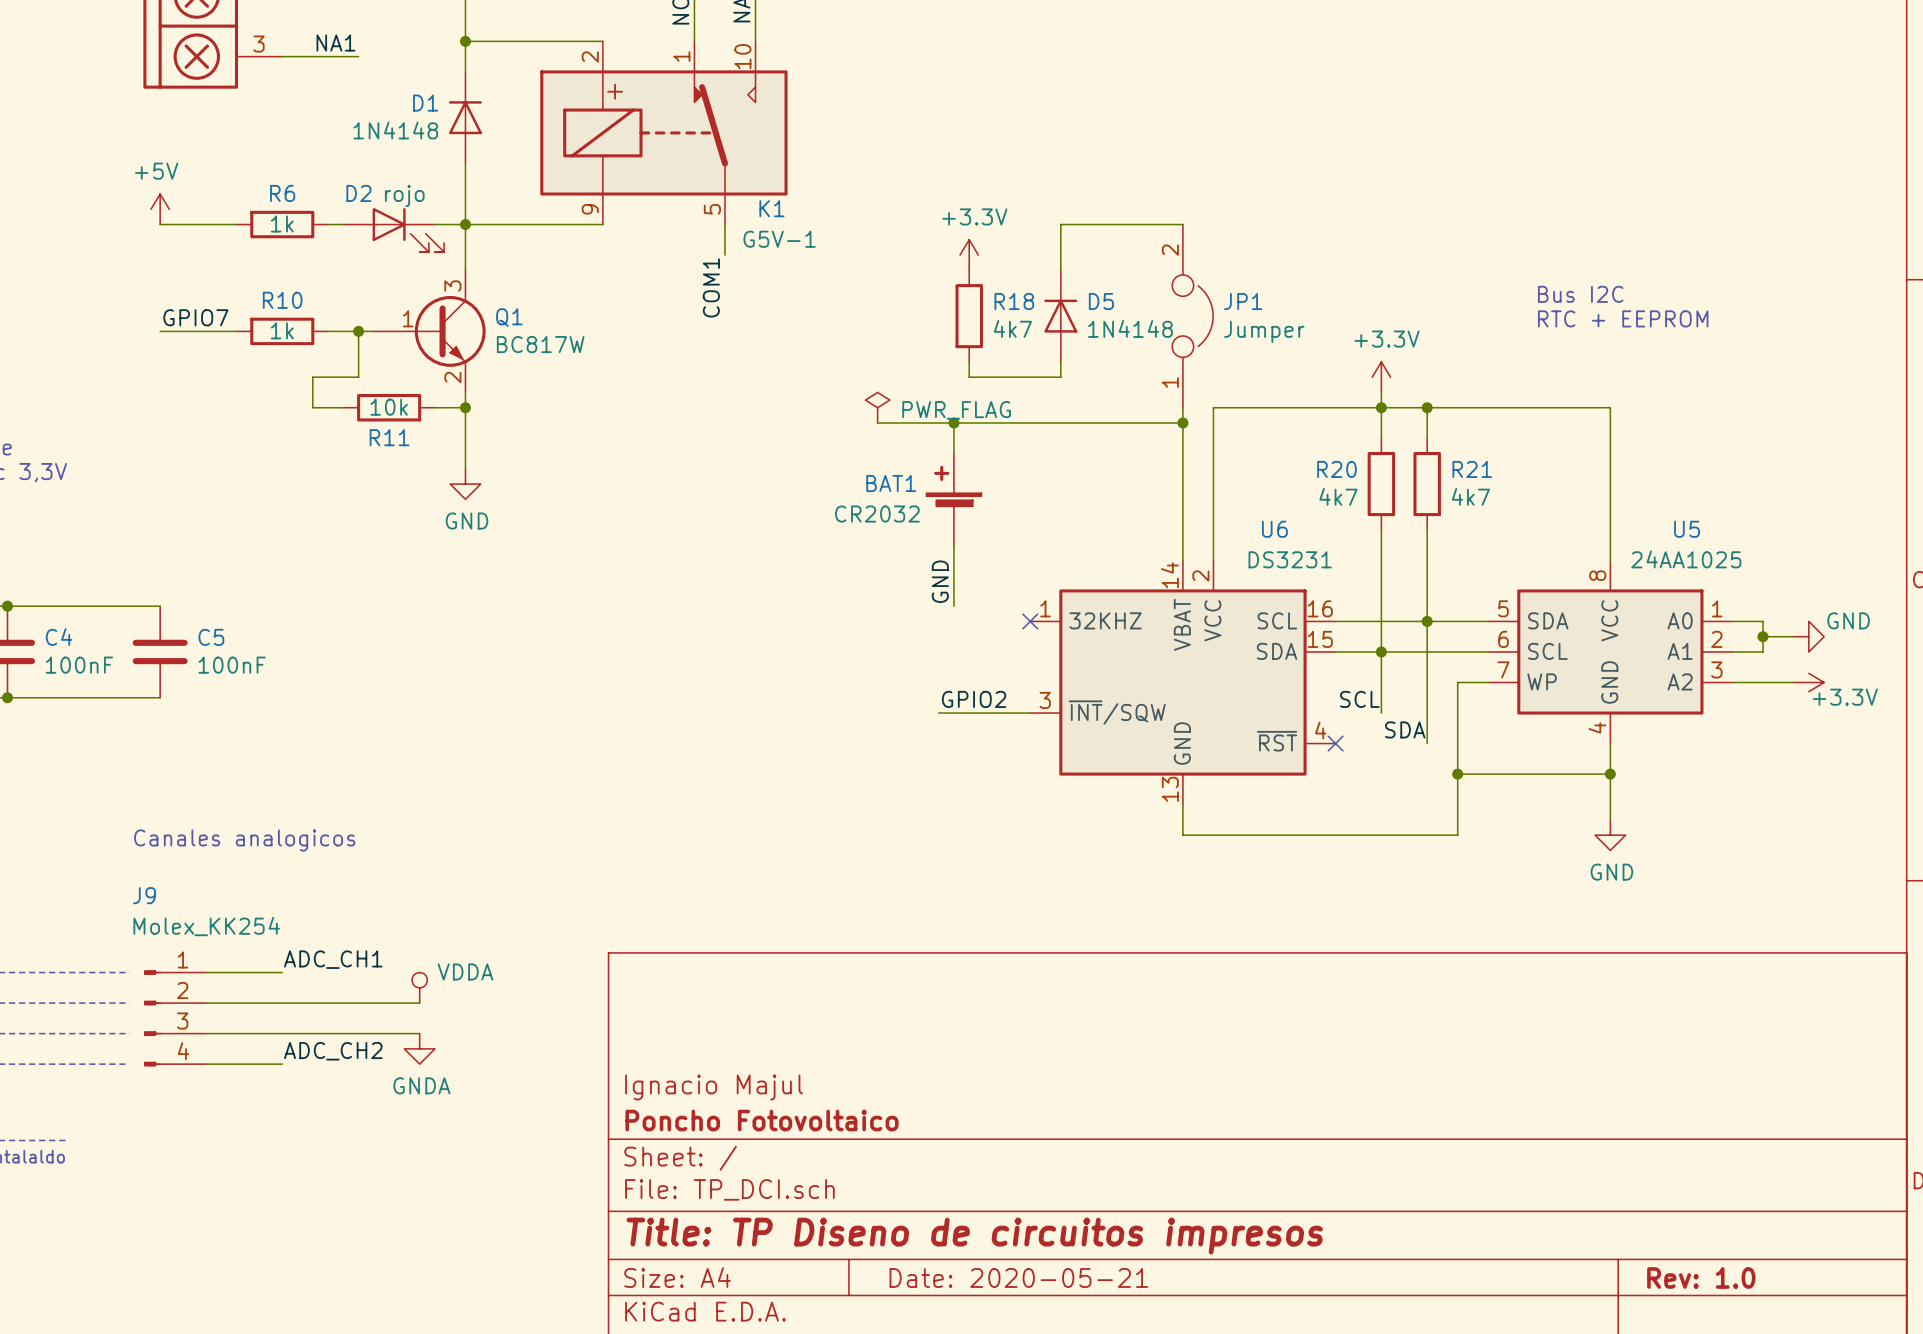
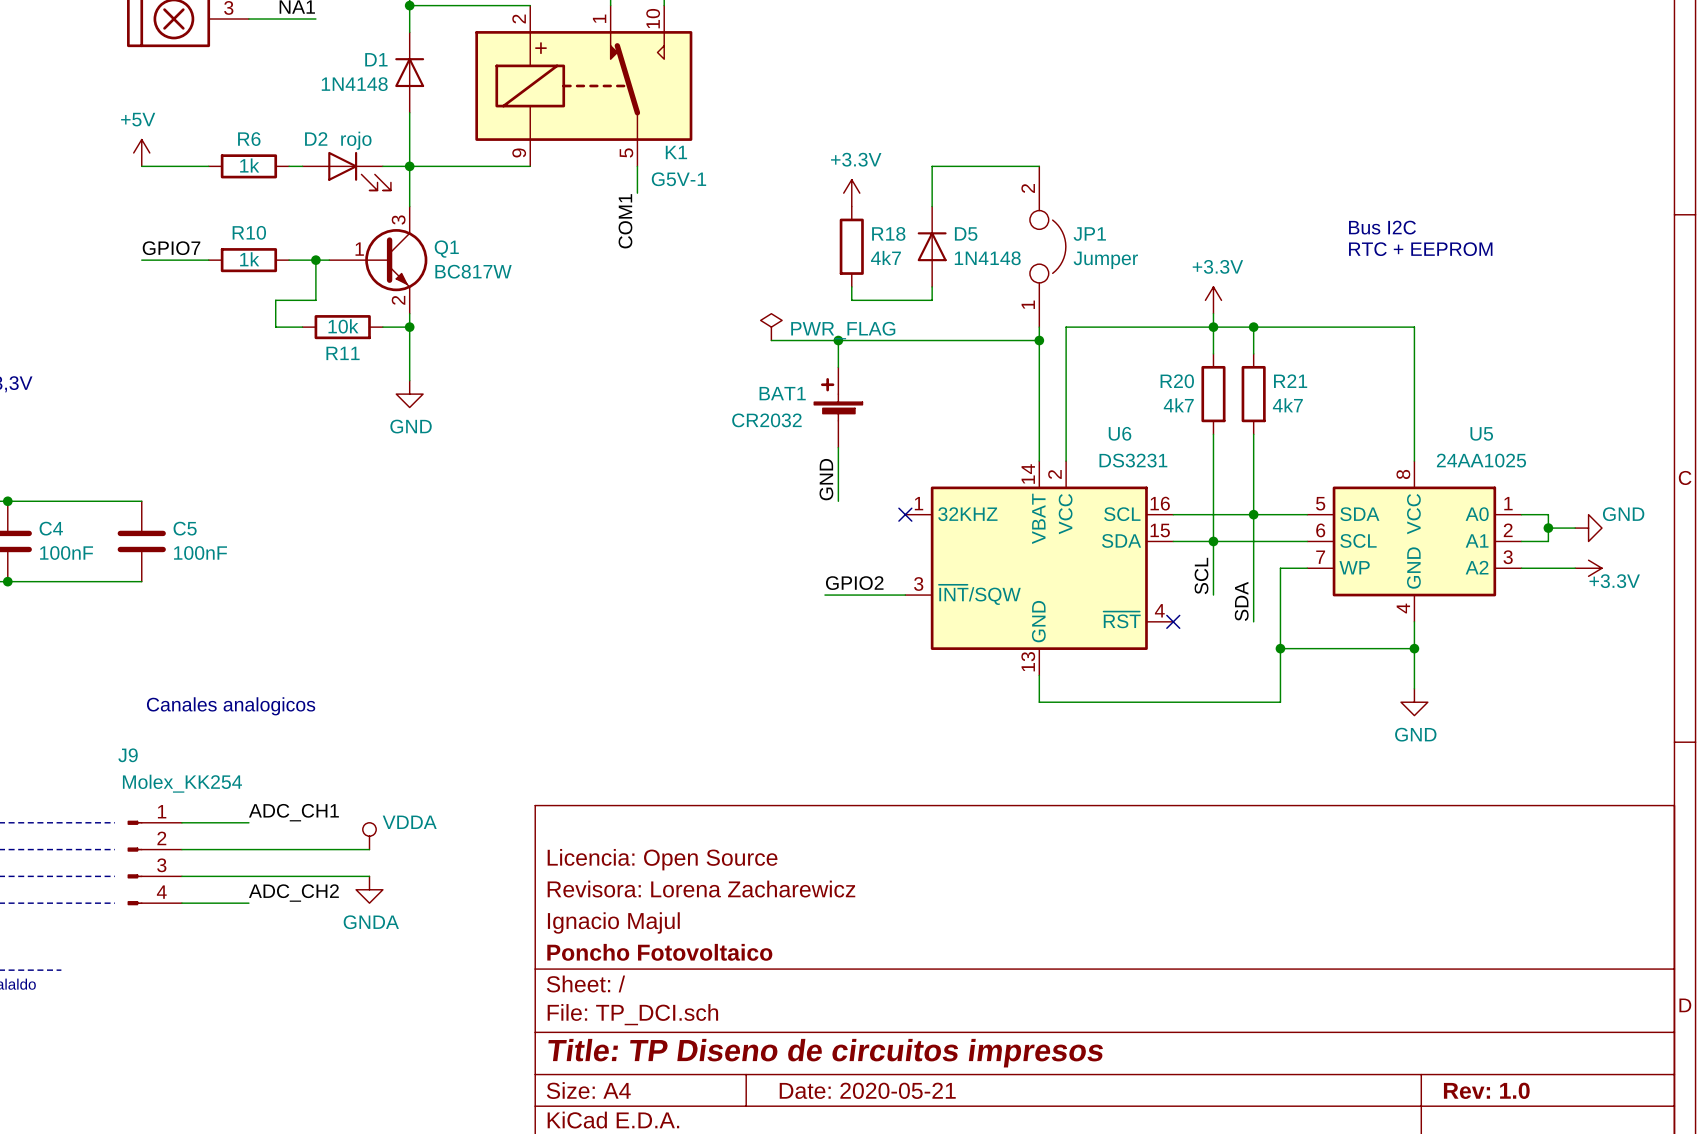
label rotation: 0° (1359, 699) -> 90° counterclockwise (1201, 575)
label rotation: 0° (1405, 729) -> 90° counterclockwise (1241, 601)
title block: none -> Licencia: Open Source (662, 859)
title block: none -> Revisora: Lorena Zacharewicz (701, 889)

